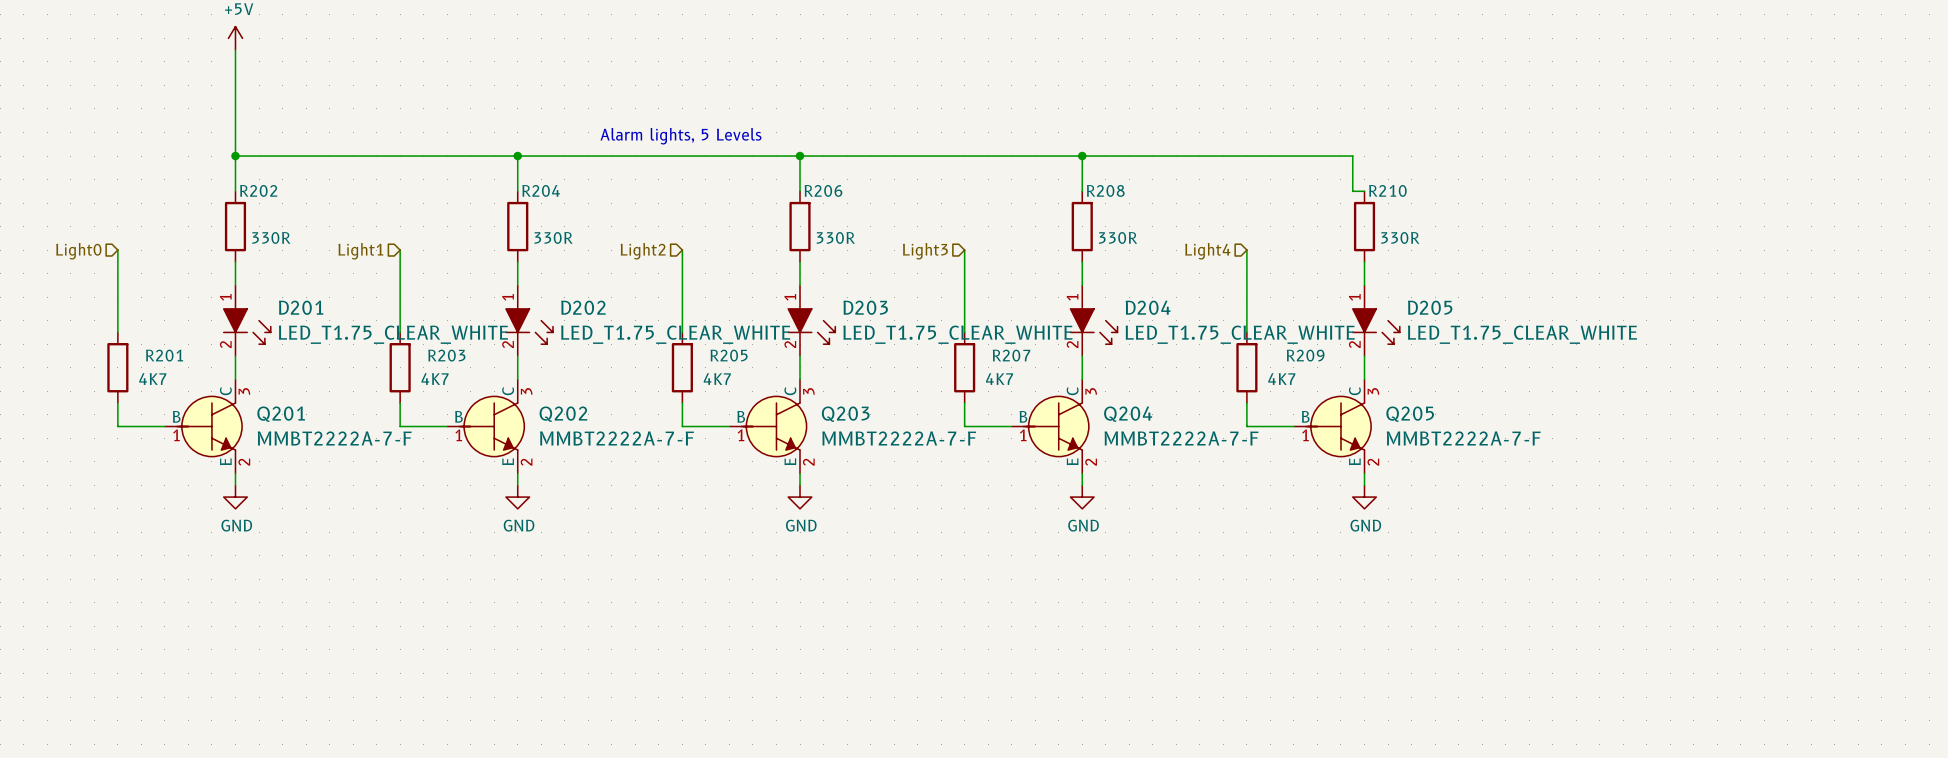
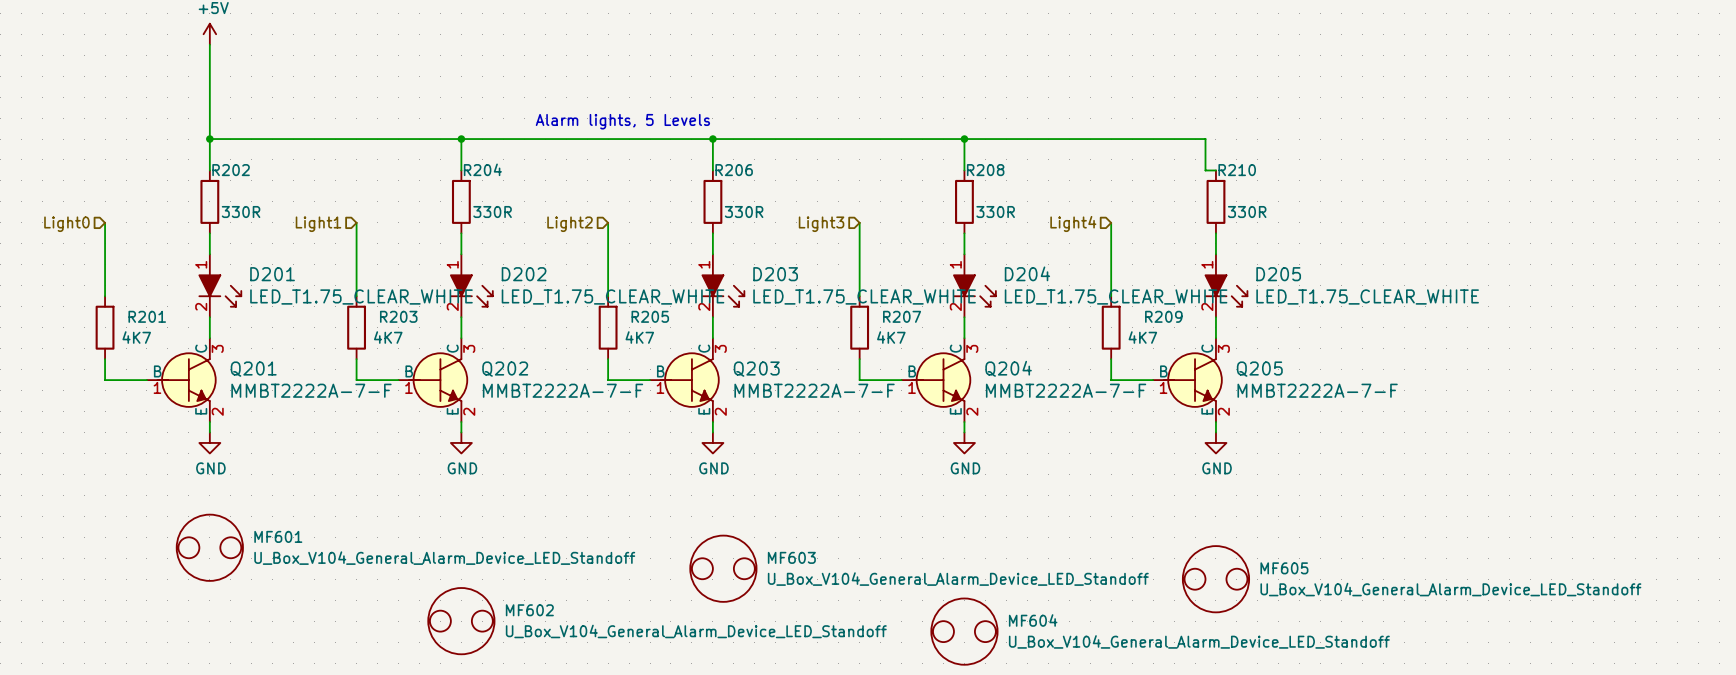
MF601: none -> U_Box_V104_General_Alarm_Device_LED_Standoff (209, 547)
MF603: none -> U_Box_V104_General_Alarm_Device_LED_Standoff (723, 568)
MF605: none -> U_Box_V104_General_Alarm_Device_LED_Standoff (1215, 579)
MF602: none -> U_Box_V104_General_Alarm_Device_LED_Standoff (461, 621)
MF604: none -> U_Box_V104_General_Alarm_Device_LED_Standoff (964, 631)

